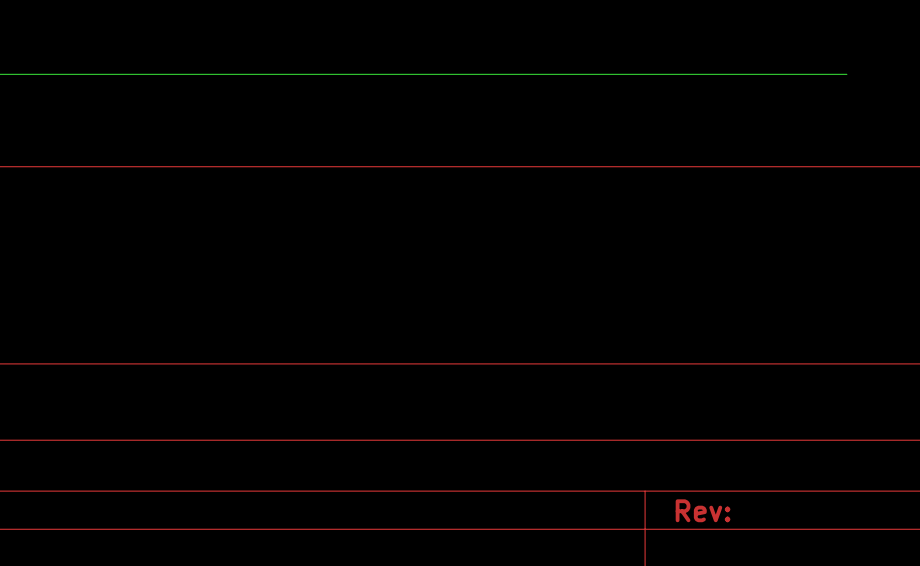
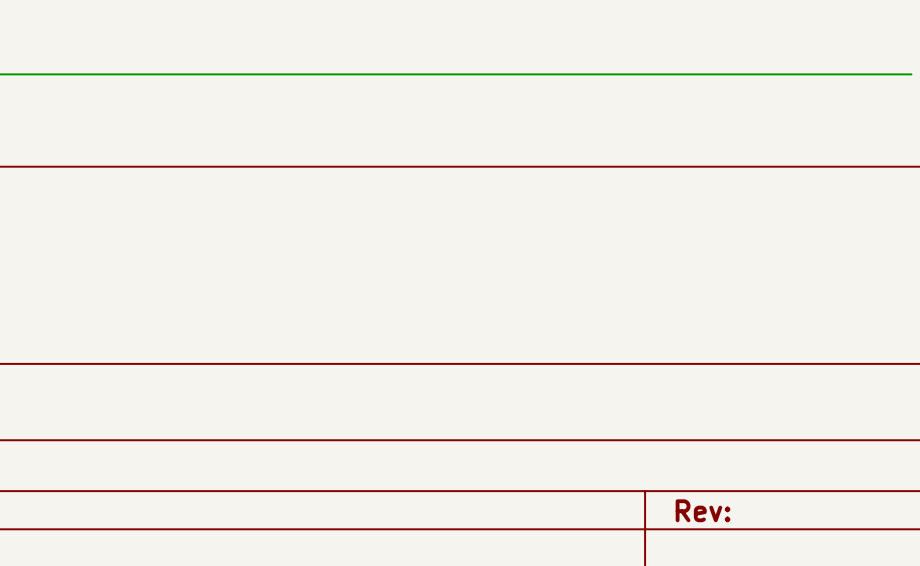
wire: none -> (846, 74) (911, 74)

